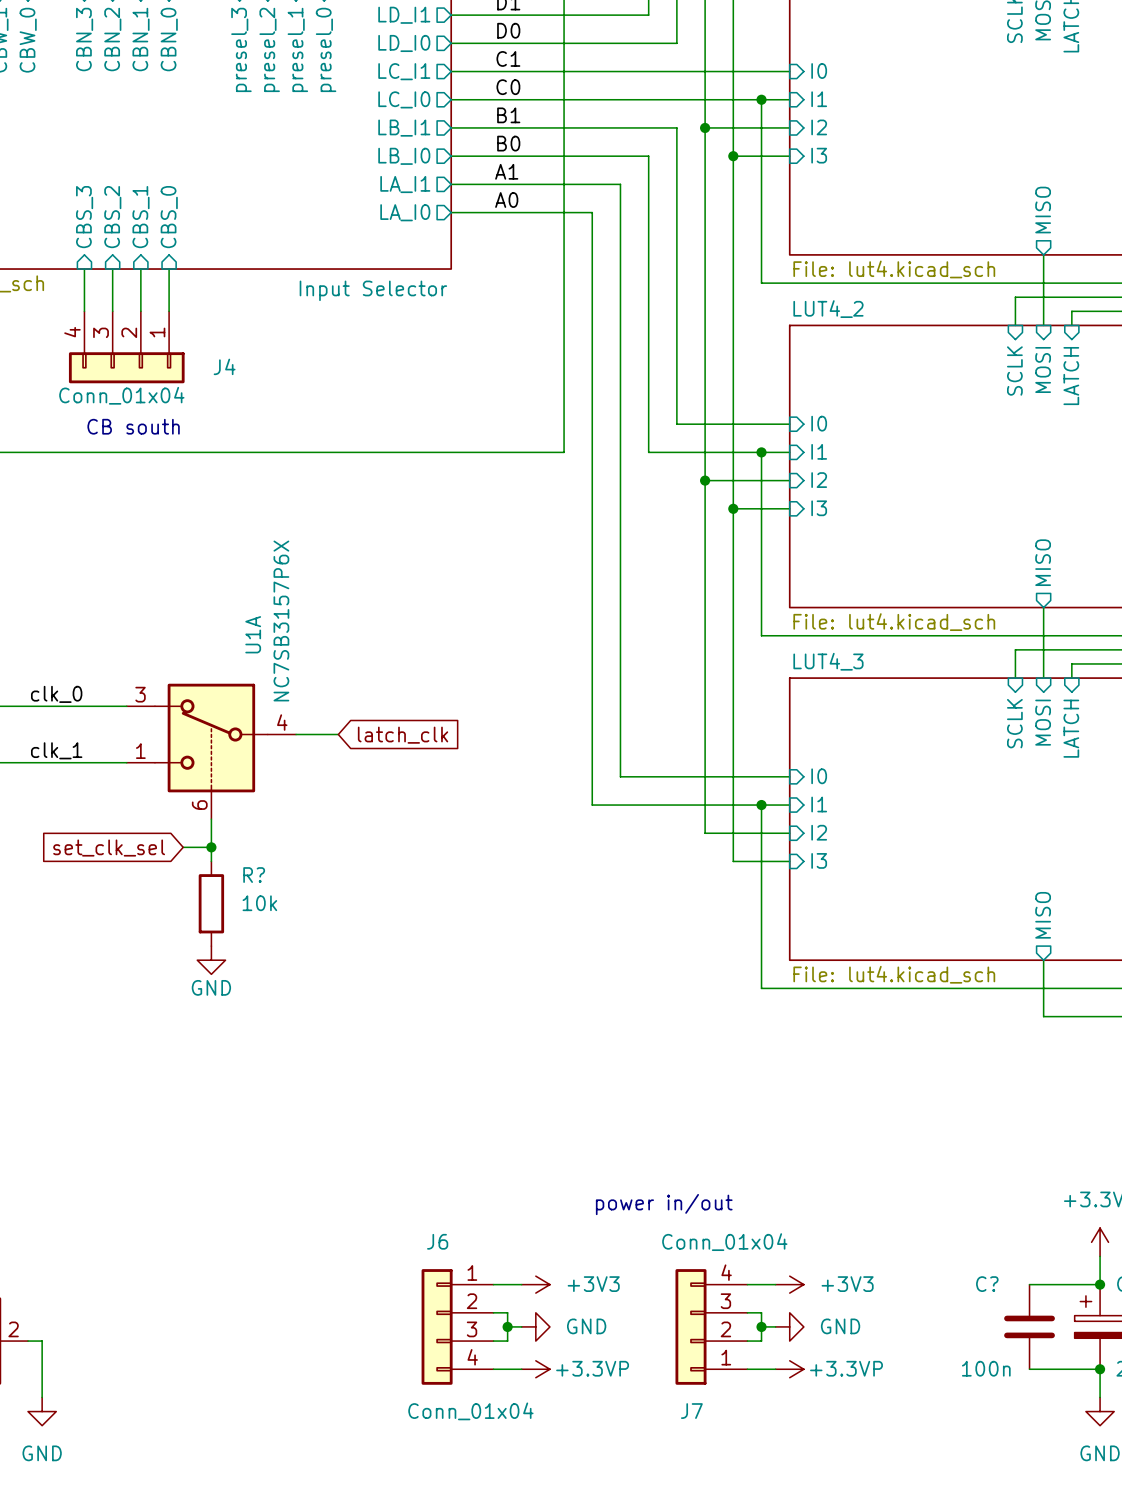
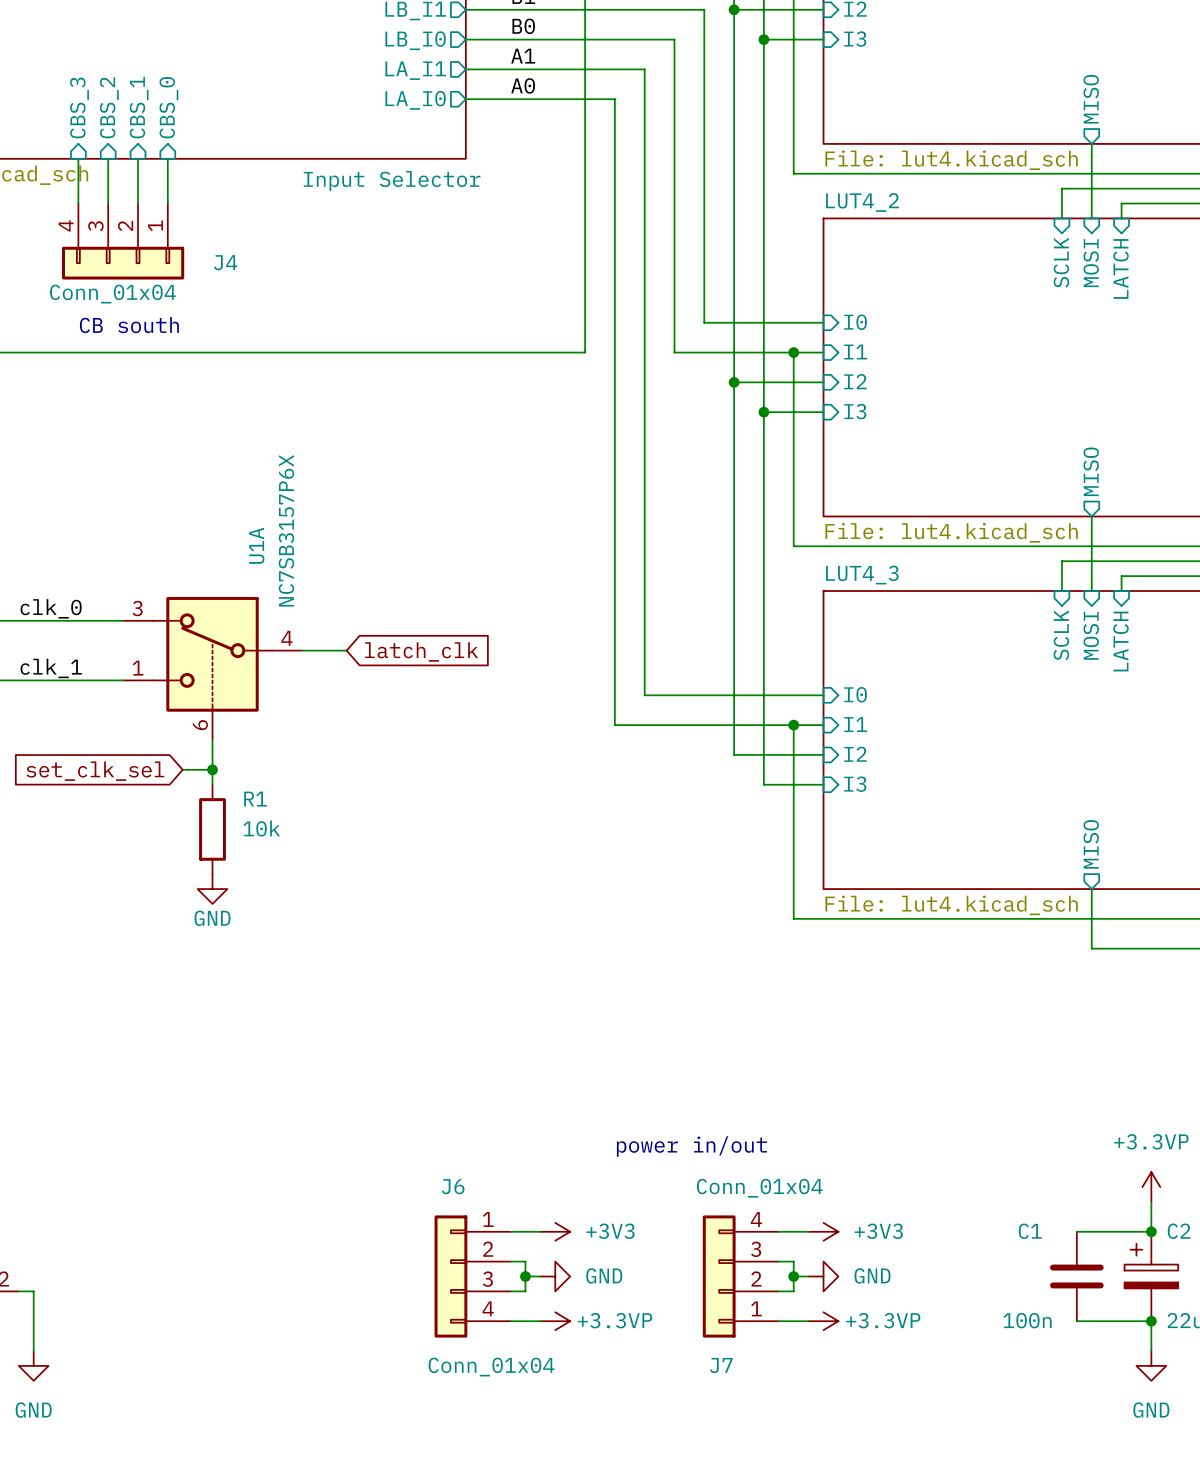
R? name: R? (254, 875) -> R1 (255, 799)
C? name: C? (987, 1284) -> C1 (1030, 1231)

